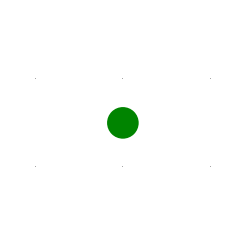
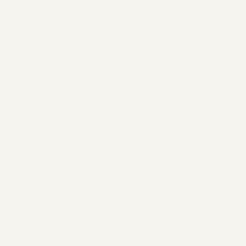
junction: (122, 122) -> none

